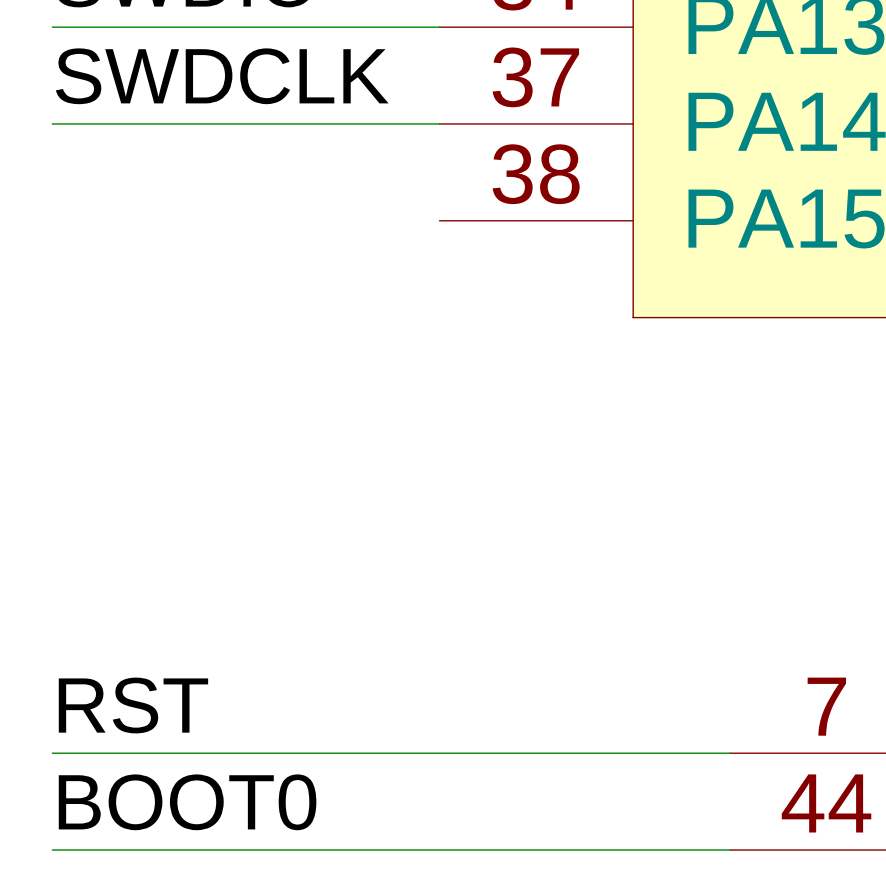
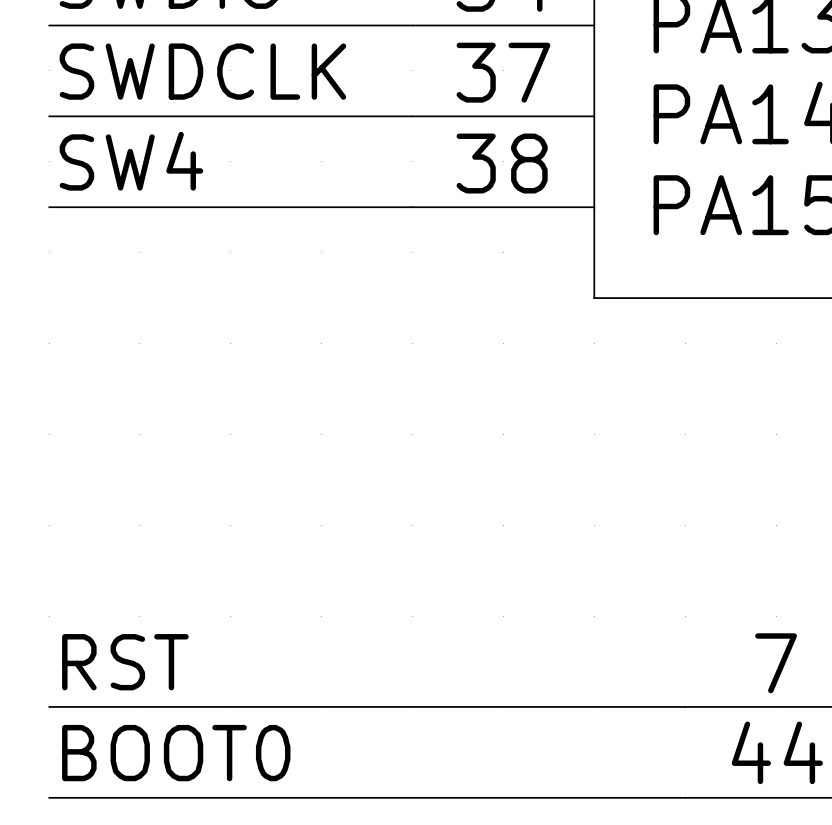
label: none -> SW4 (131, 161)
wire: none -> (49, 207) (412, 207)

